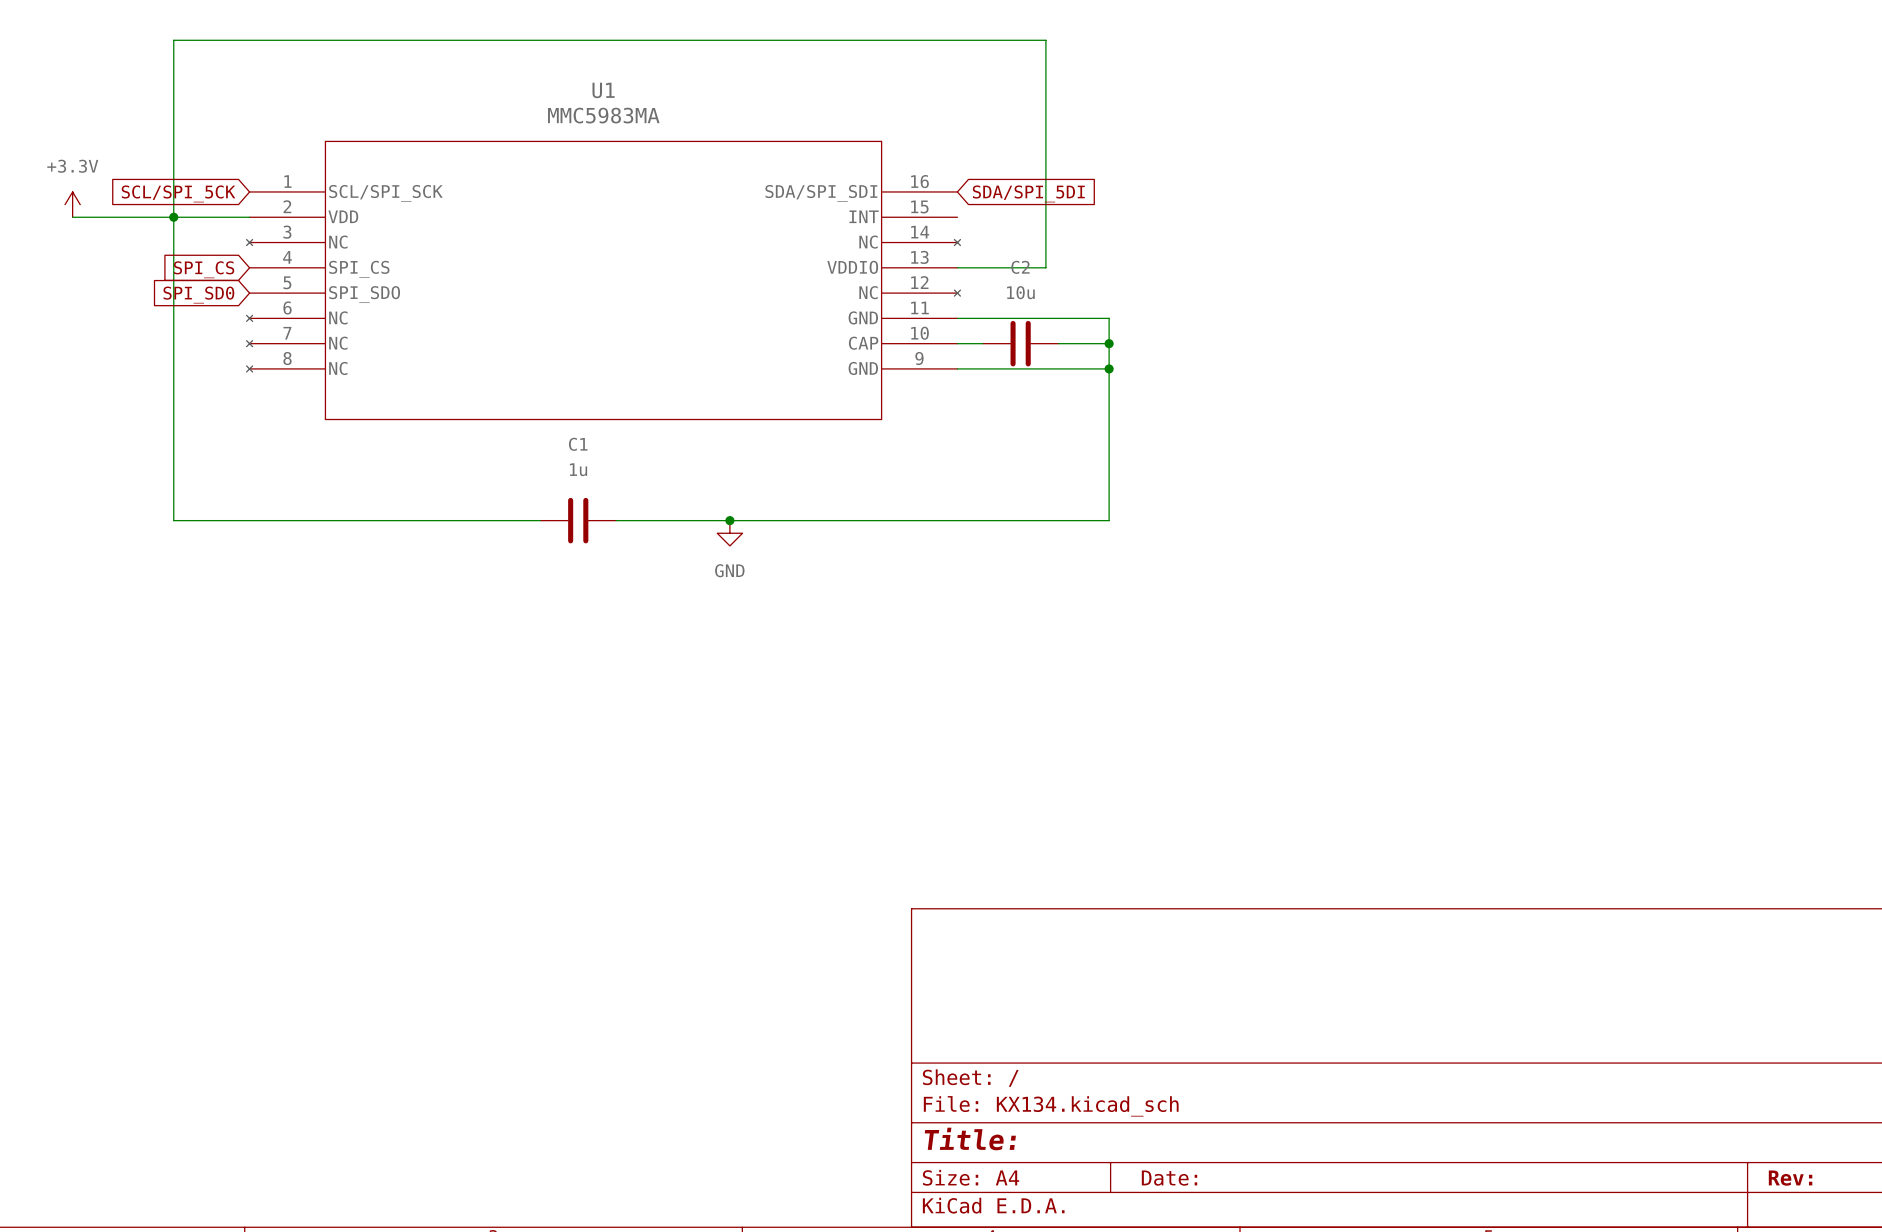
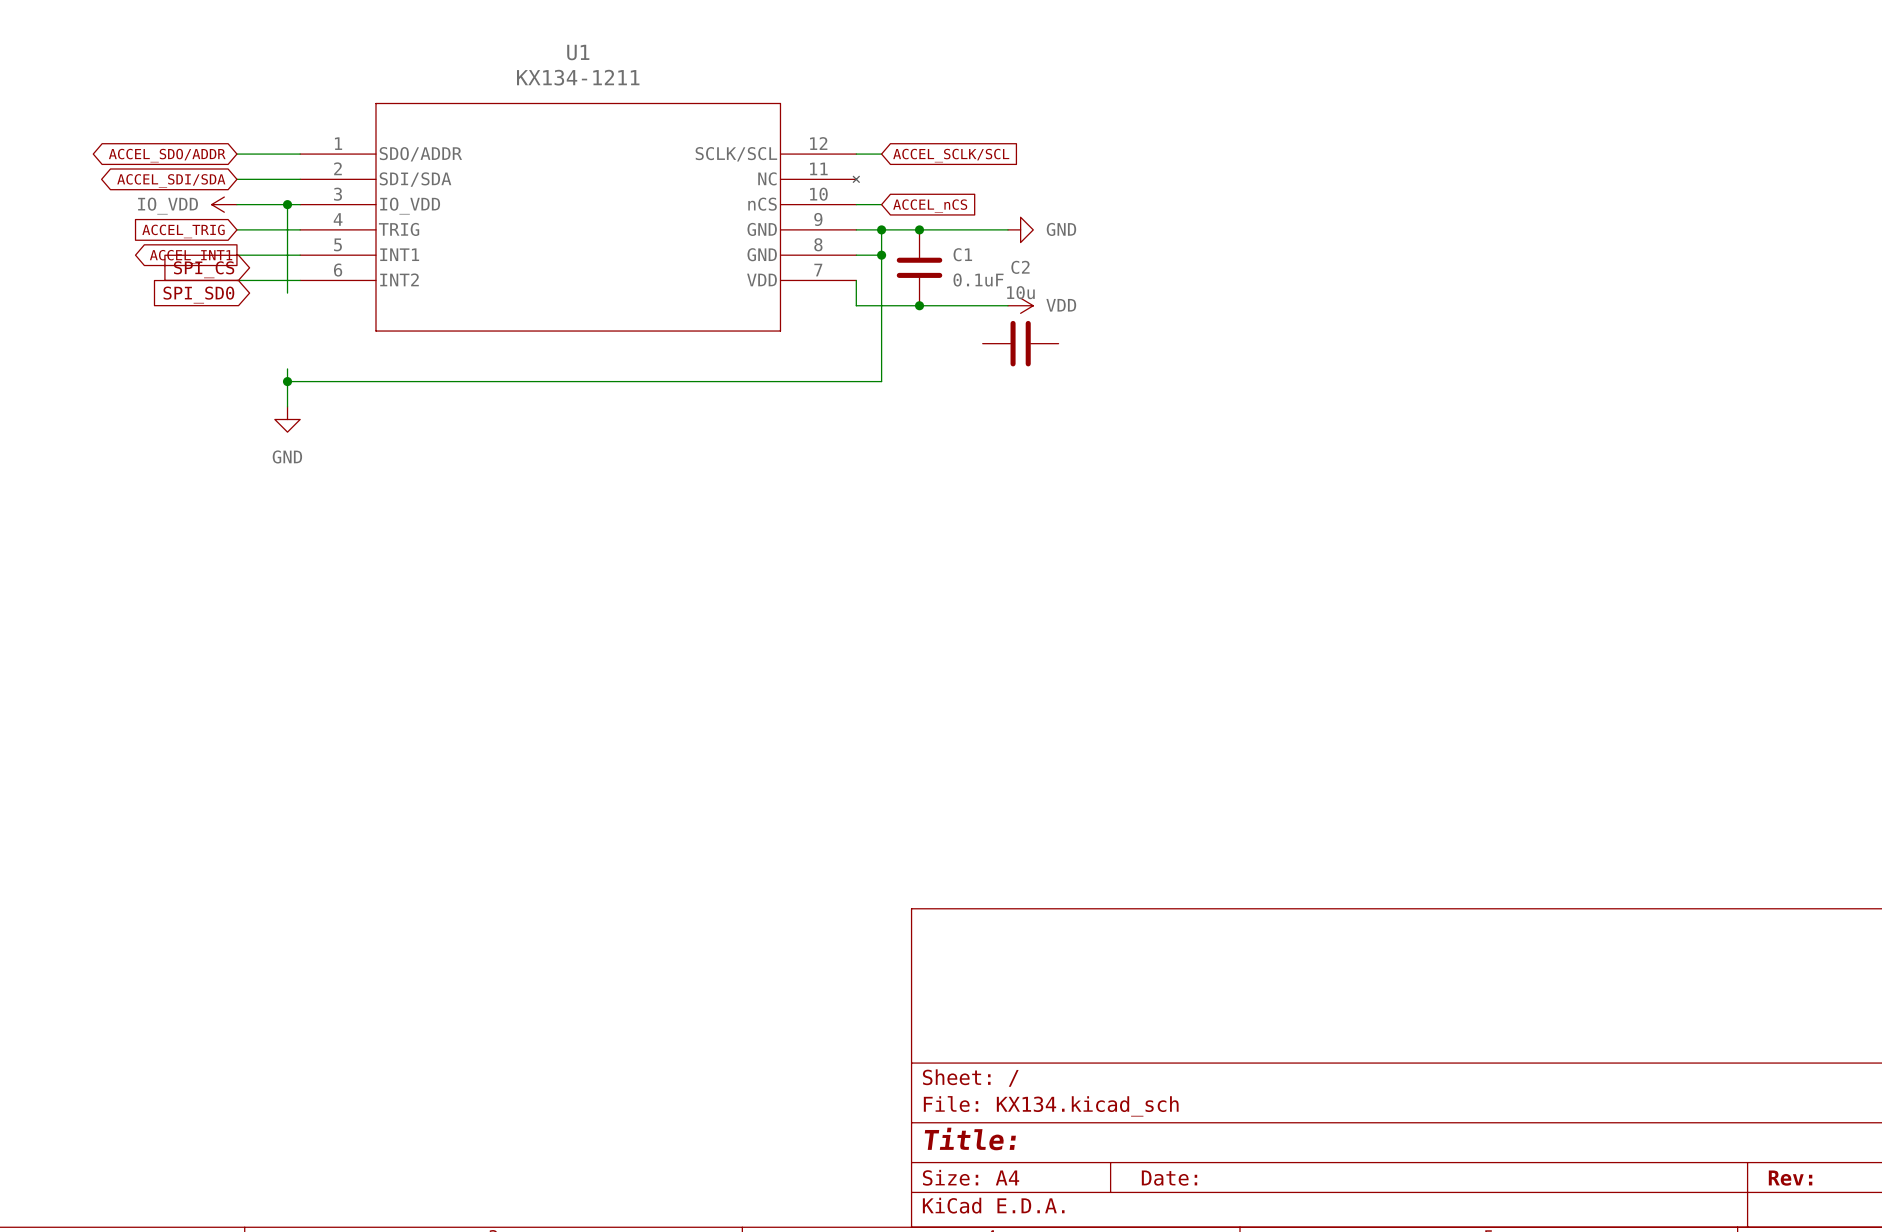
U1 name position: U1 (603, 90) -> U1 (578, 52)
U1 value: MMC5983MA (603, 115) -> KX134-1211 (578, 77)
U1 symbol: [246, 140, 961, 421] -> [300, 102, 860, 332]
wire: none -> (236, 154) (300, 154)
wire: none -> (856, 154) (881, 154)
global label: none -> ACCEL_SDO/ADDR (167, 155)
global label: none -> ACCEL_SCLK/SCL (951, 155)
wire: none -> (236, 179) (300, 179)
global label: none -> ACCEL_SDI/SDA (171, 180)
global label: SCL/SPI_5CK (178, 193) -> none
global label: SDA/SPI_5DI (1028, 193) -> none
power symbol: +3.3V (72, 204) -> none
power symbol: none -> IO_VDD (224, 204)
wire: none -> (236, 204) (300, 204)
wire: none -> (287, 204) (287, 293)
junction: none -> (287, 204)
global label: none -> ACCEL_nCS (930, 206)
wire: (72, 217) (249, 217) -> none
junction: (173, 217) -> none
wire: none -> (236, 229) (300, 229)
wire: none -> (881, 229) (881, 381) (287, 381)
junction: none -> (881, 229)
junction: none -> (919, 229)
power symbol: none -> GND (1020, 229)
global label: none -> ACCEL_TRIG (183, 231)
wire: none -> (236, 255) (300, 255)
wire: none -> (856, 255) (881, 255)
junction: none -> (881, 255)
global label: none -> ACCEL_INT1 (191, 256)
wire: (957, 267) (1045, 267) (1045, 40) (173, 40) (173, 520) (540, 520) -> none
wire: none -> (236, 280) (300, 280)
wire: none -> (856, 280) (856, 305) (1007, 305)
junction: none -> (919, 305)
power symbol: none -> VDD (1020, 305)
wire: (957, 318) (1109, 318) (1109, 520) (616, 520) -> none
wire: (957, 343) (982, 343) -> (856, 204) (881, 204)
wire: (1058, 343) (1109, 343) -> none
junction: (1109, 343) -> none
wire: none -> (287, 368) (287, 406)
wire: (957, 368) (1109, 368) -> (856, 229) (1007, 229)
junction: (1109, 368) -> none
junction: none -> (287, 381)
power symbol: none -> GND (287, 419)
C1 name position: C1 (578, 444) -> C1 (962, 254)
C1 value: 1u (578, 469) -> 0.1uF (978, 280)
C1 rotation: 0° (578, 520) -> 90° clockwise (919, 267)
C1 position: (578, 520) -> (919, 267)
junction: (729, 520) -> none
power symbol: GND (729, 533) -> none

